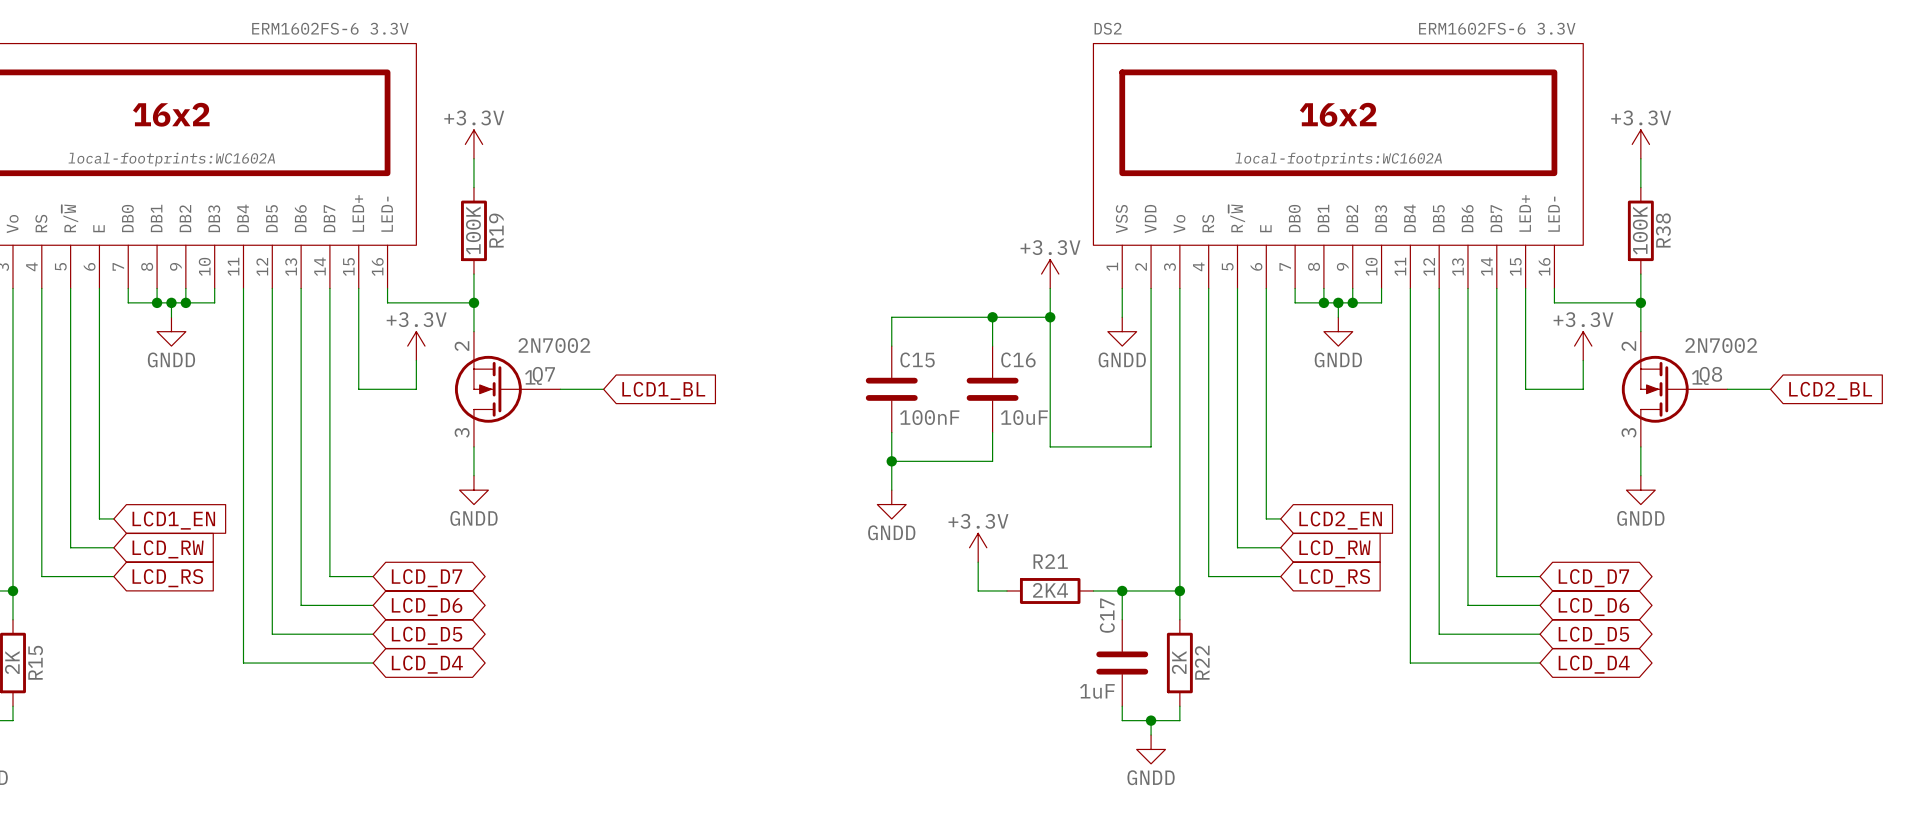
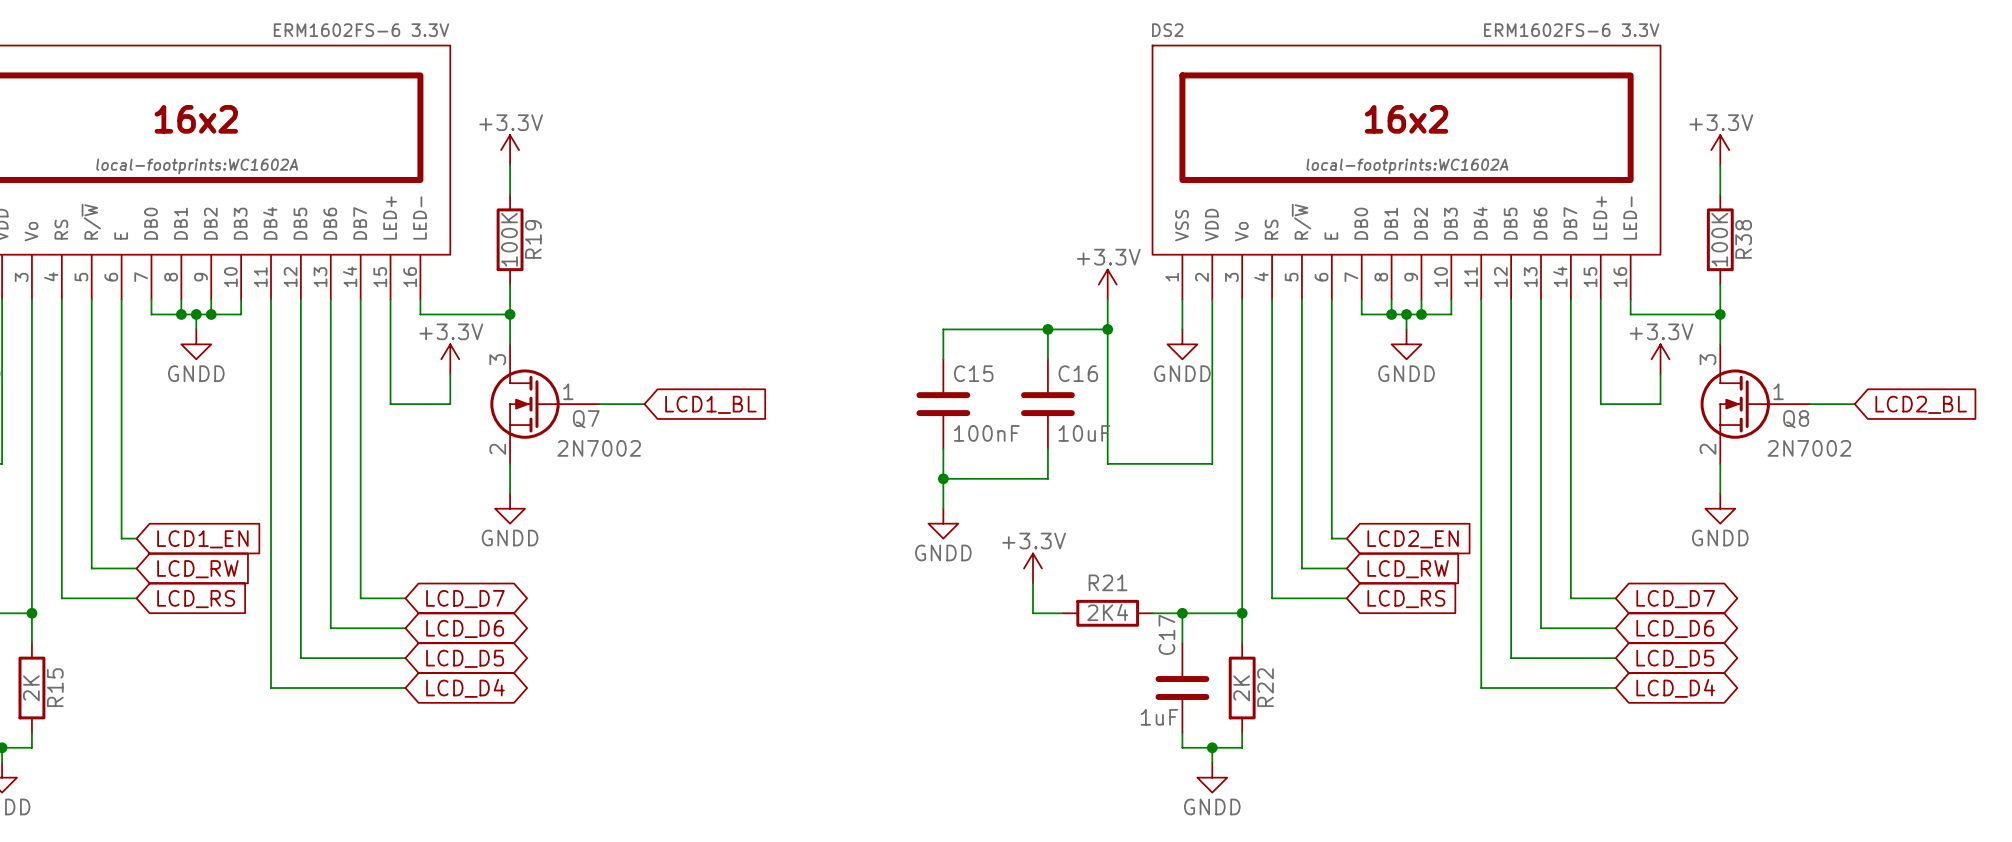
Q7 flip: as is (488, 389) -> up-down (525, 404)
Q8 flip: as is (1655, 389) -> up-down (1735, 404)

